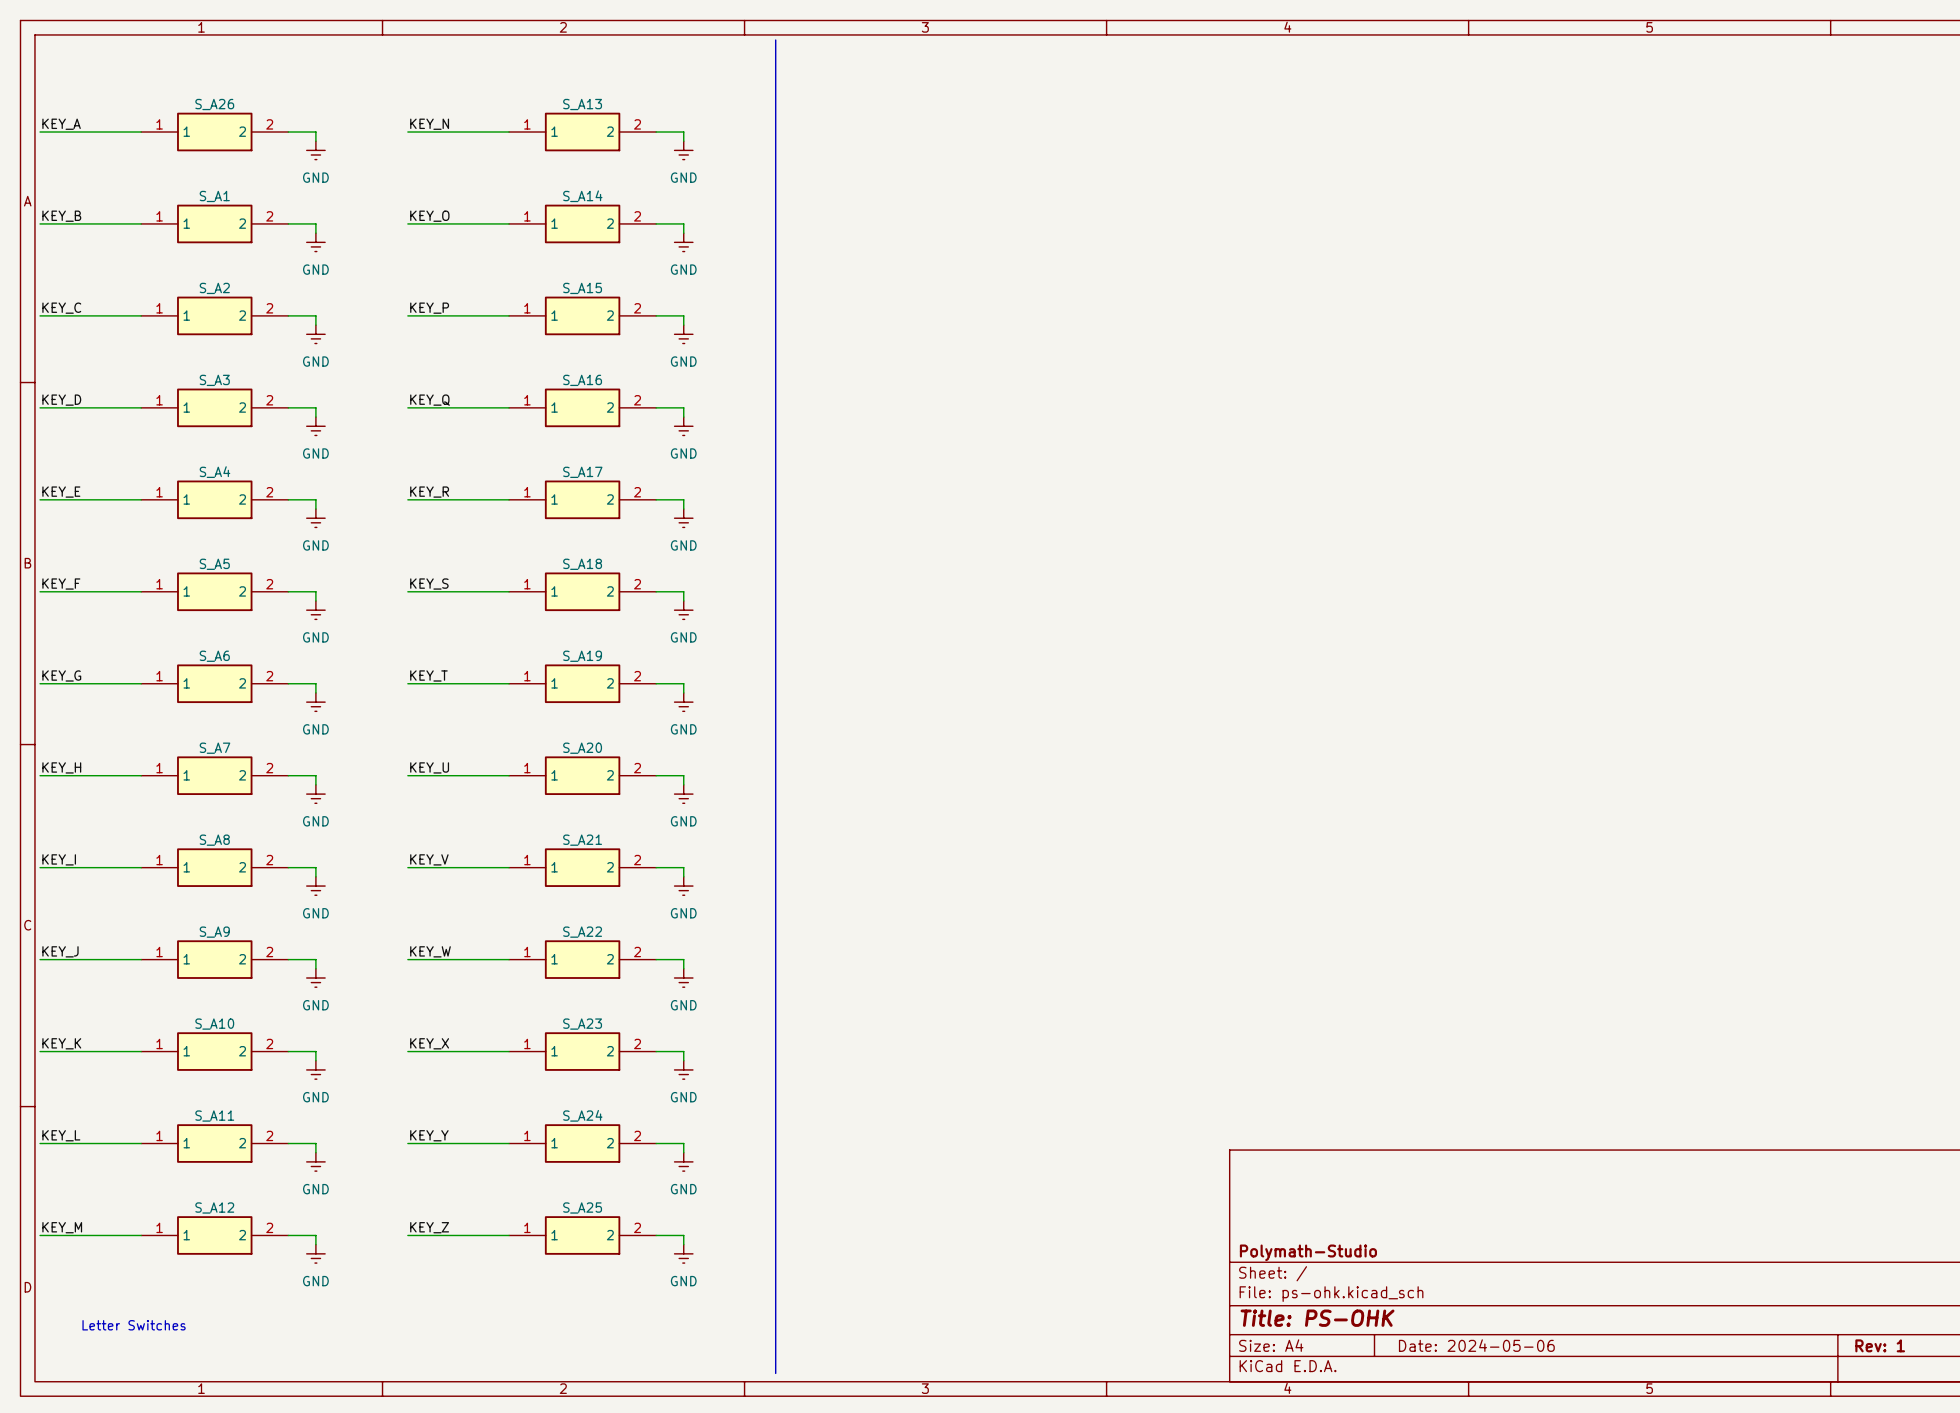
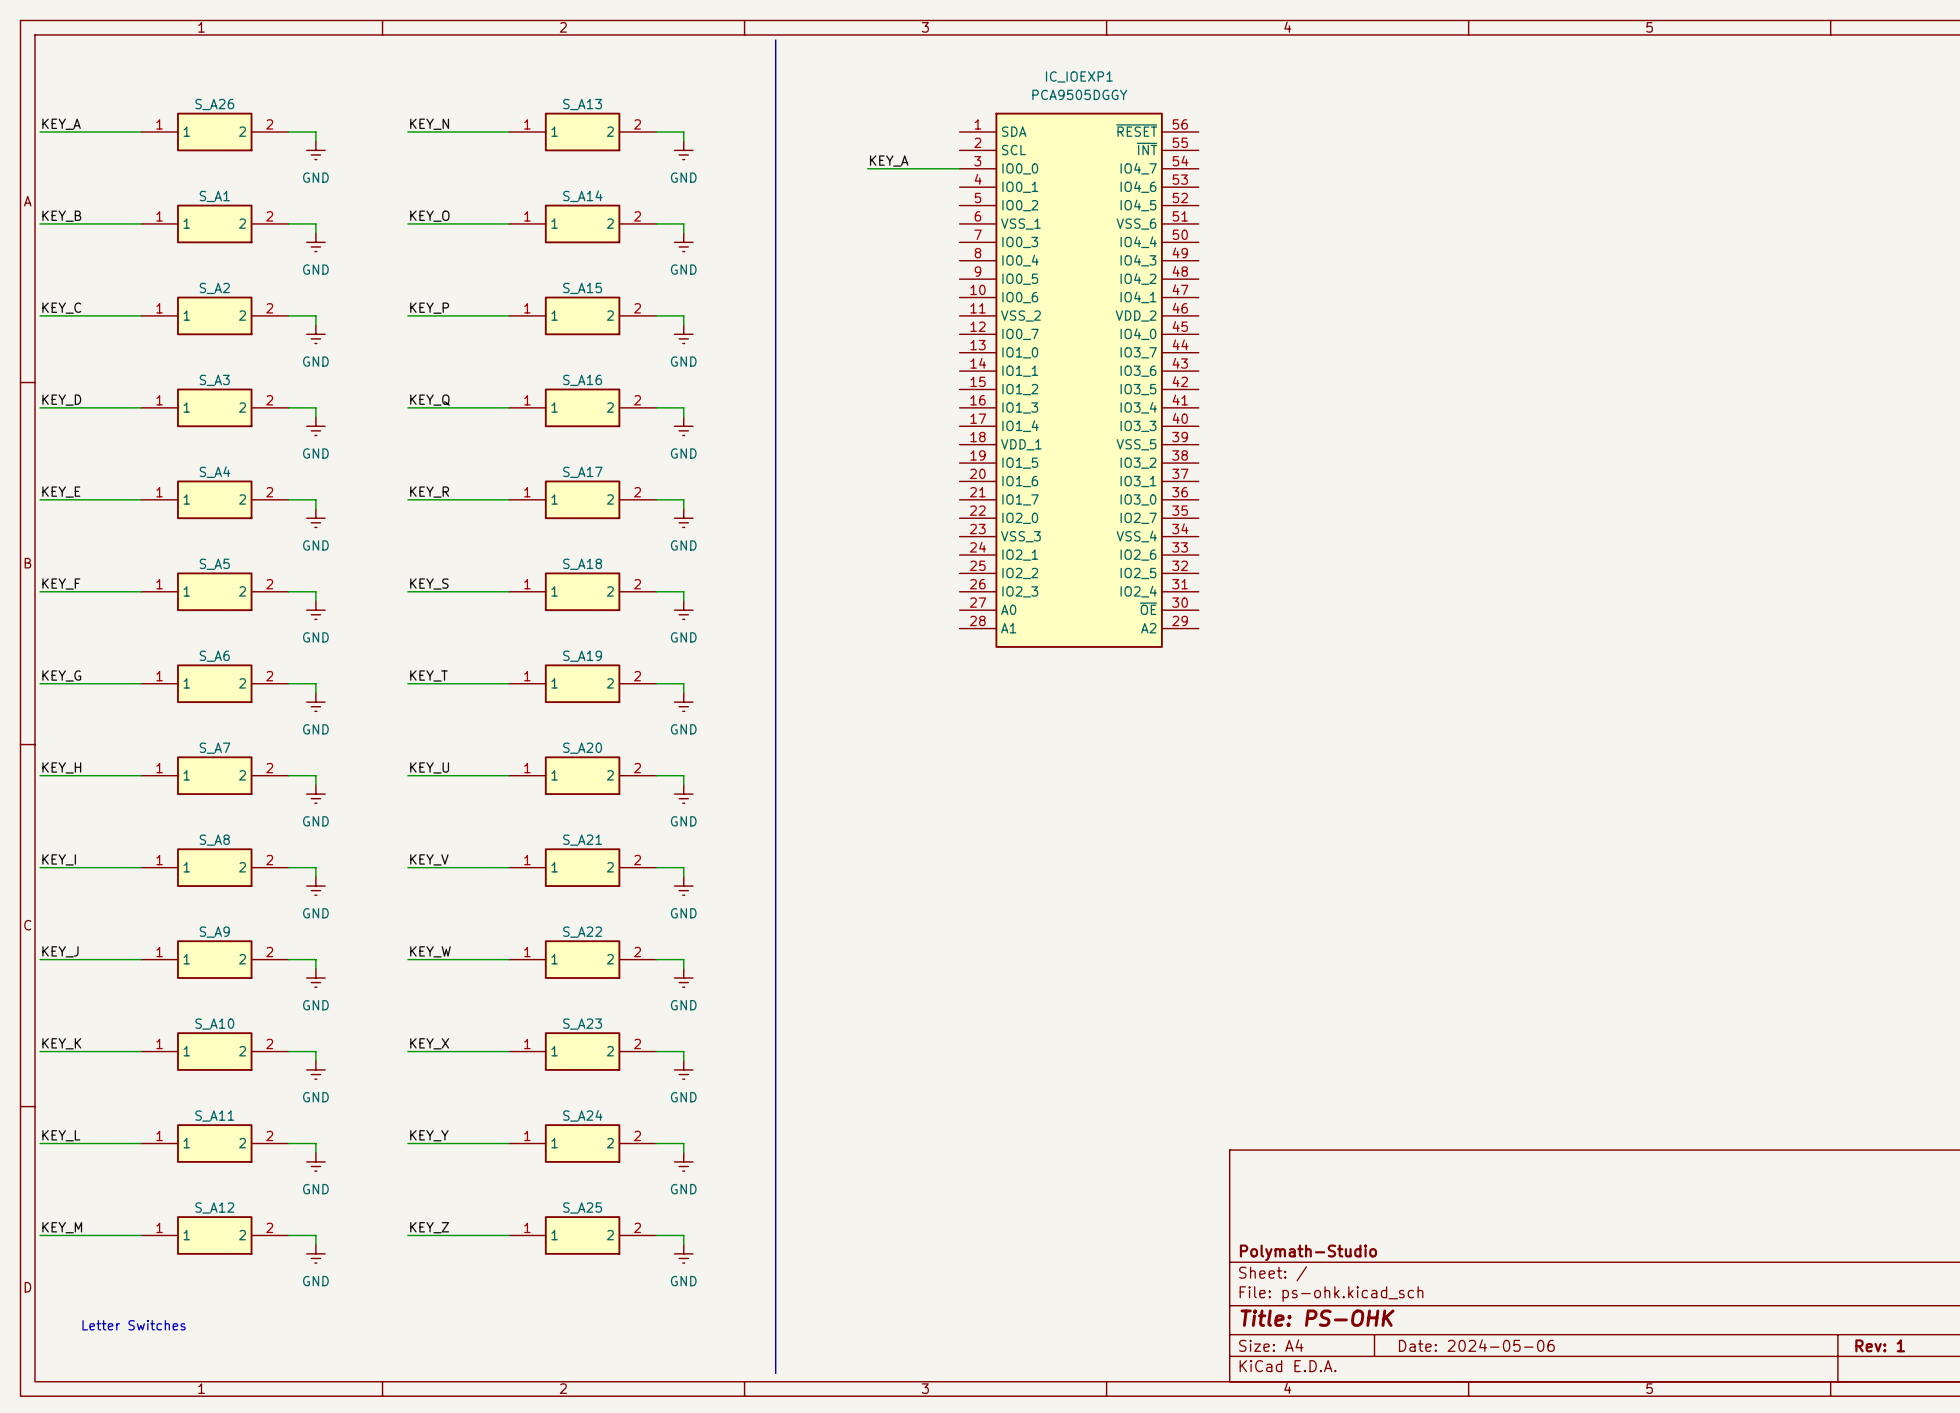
label: none -> KEY_A (889, 161)
wire: none -> (867, 168) (959, 168)
IC_IOEXP1: none -> PCA9505DGGY (1079, 380)

